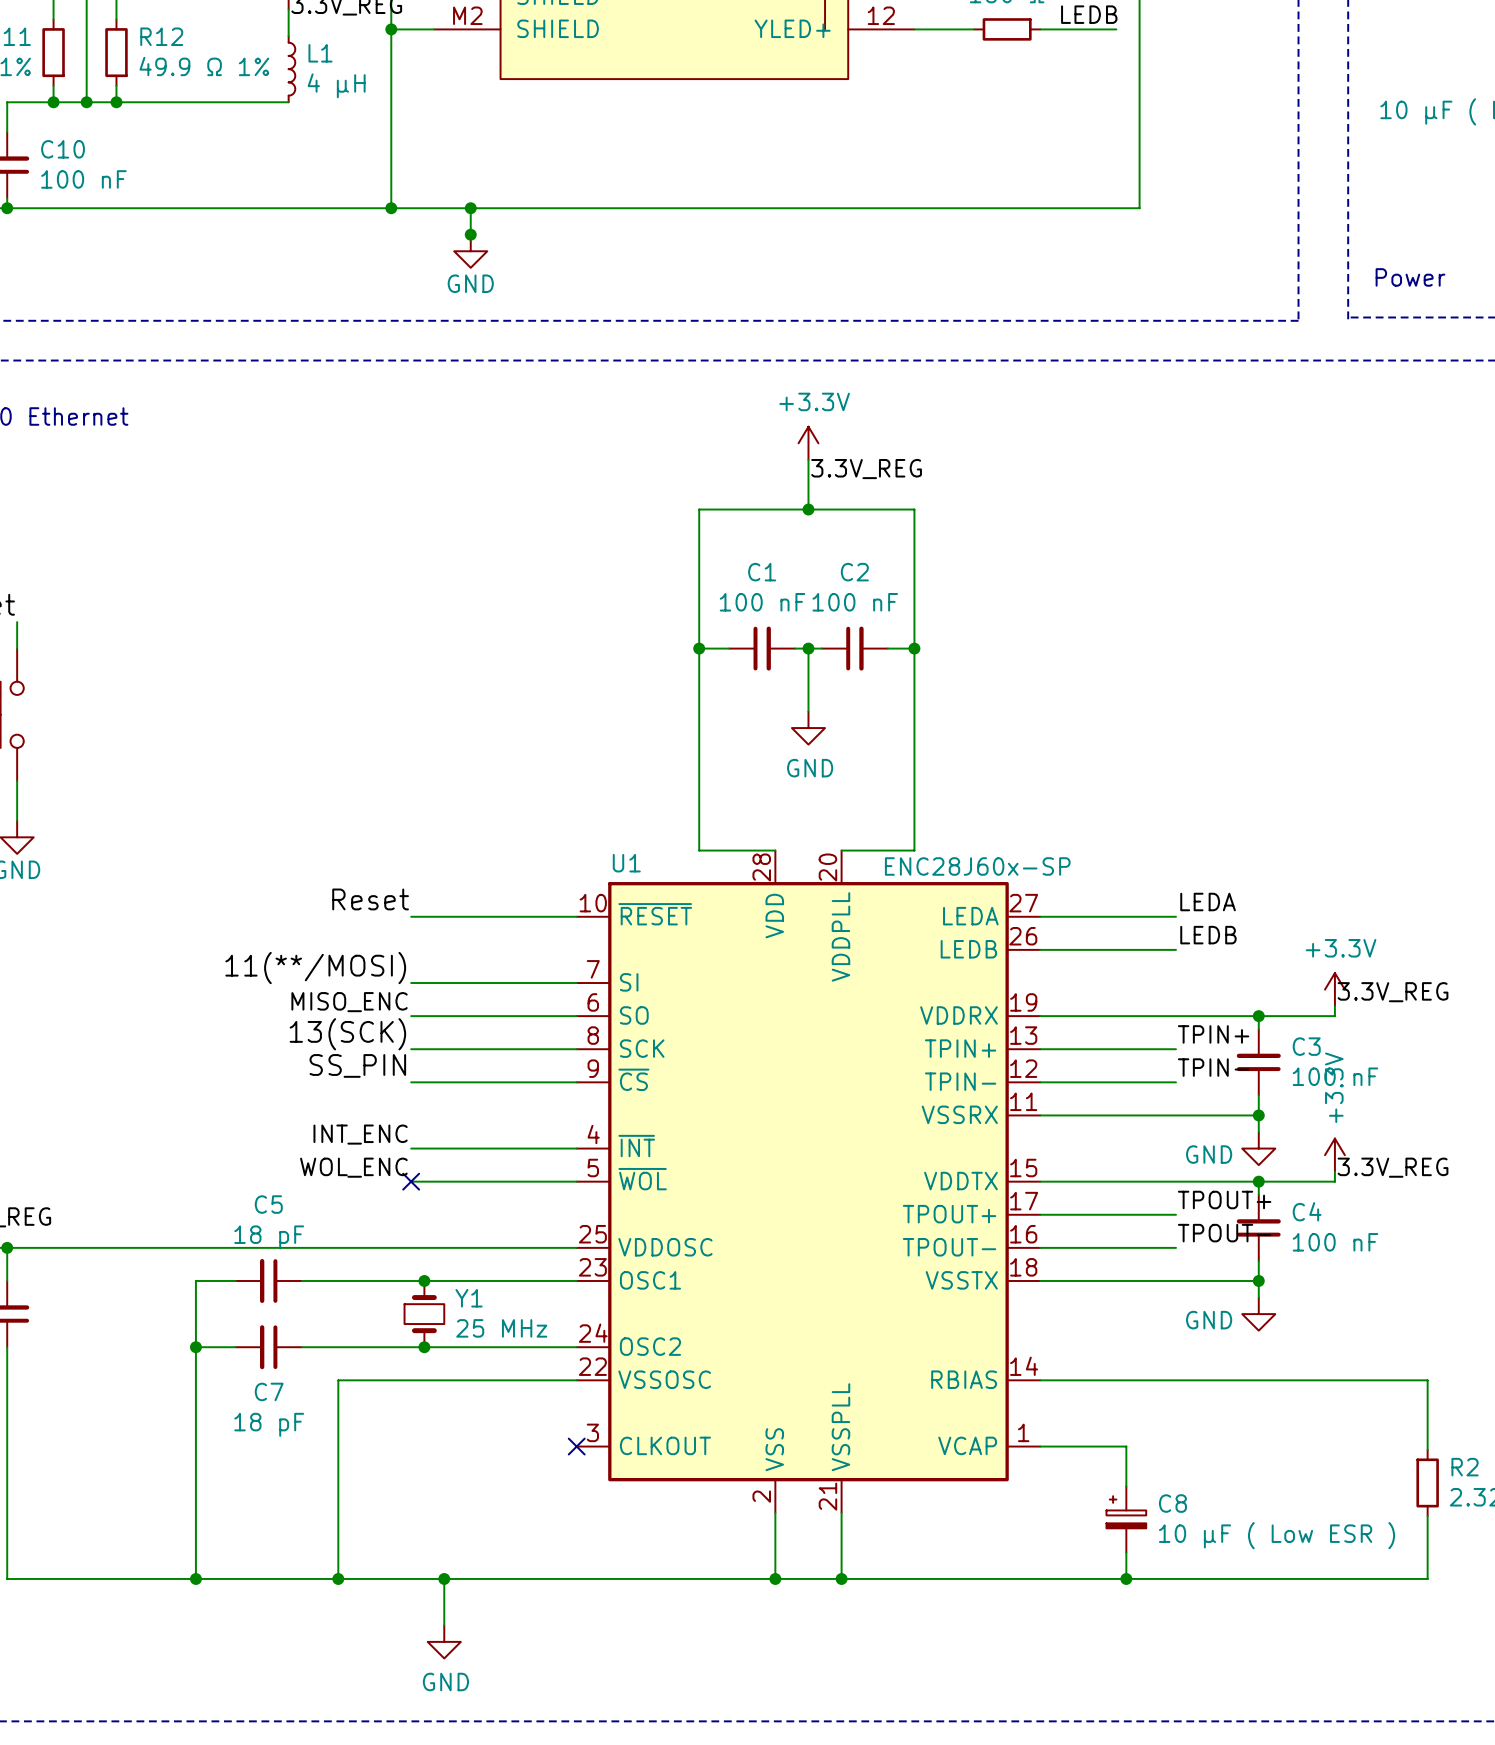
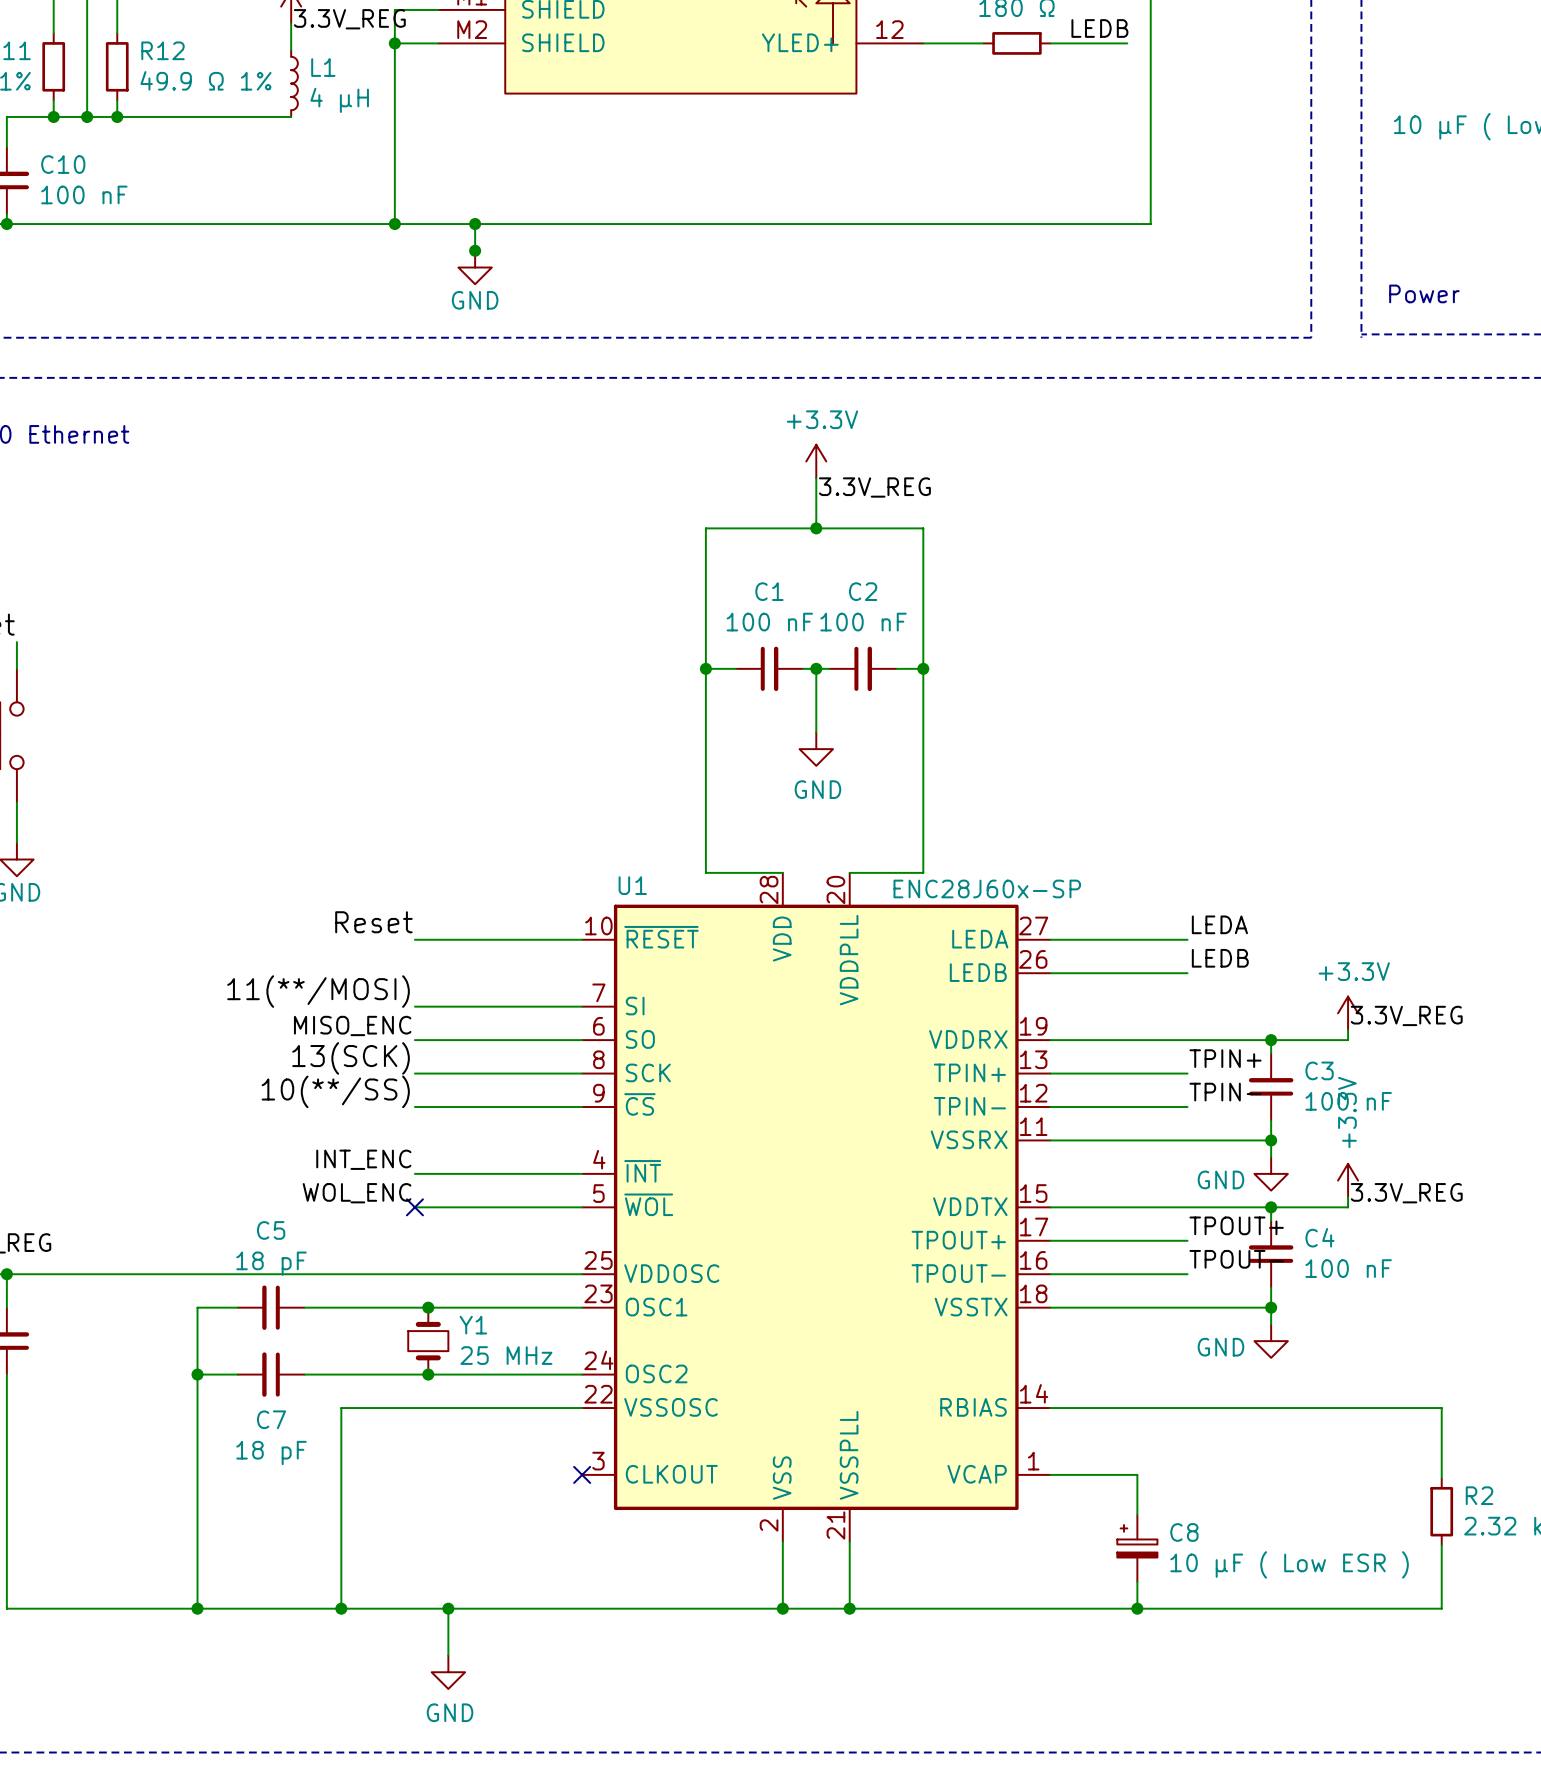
label: SS_PIN (357, 1065) -> 10(**/SS) (335, 1091)

